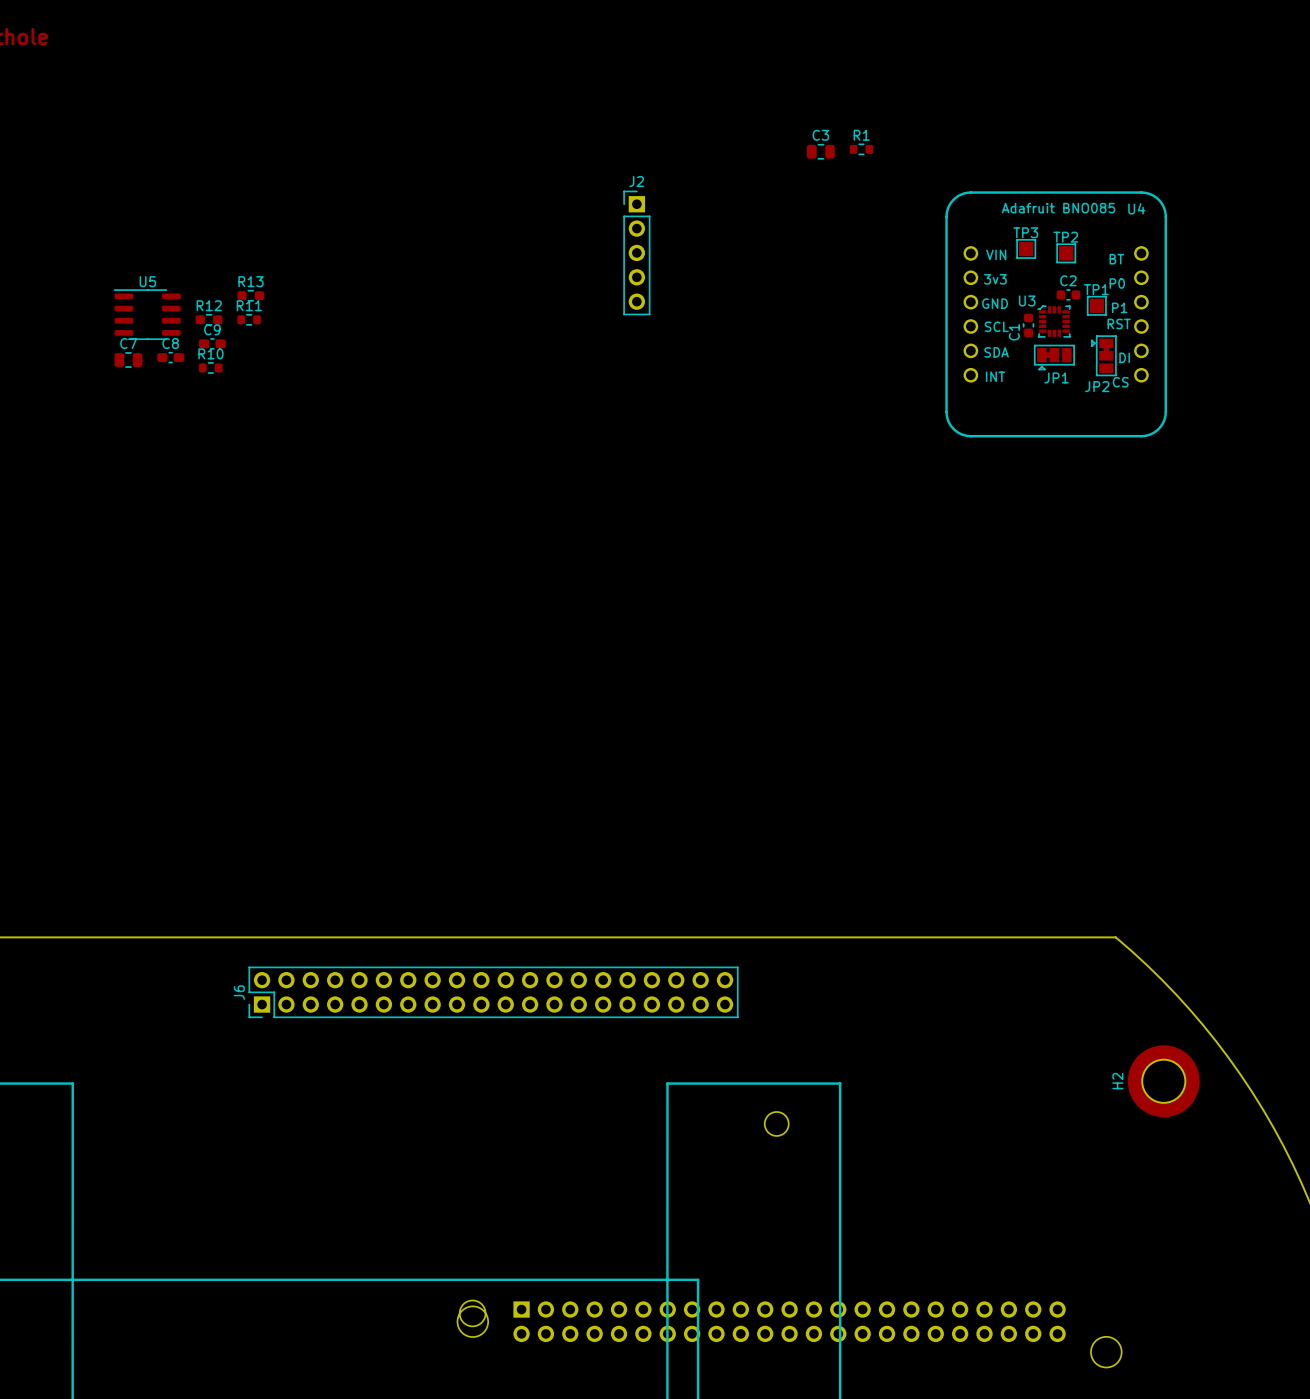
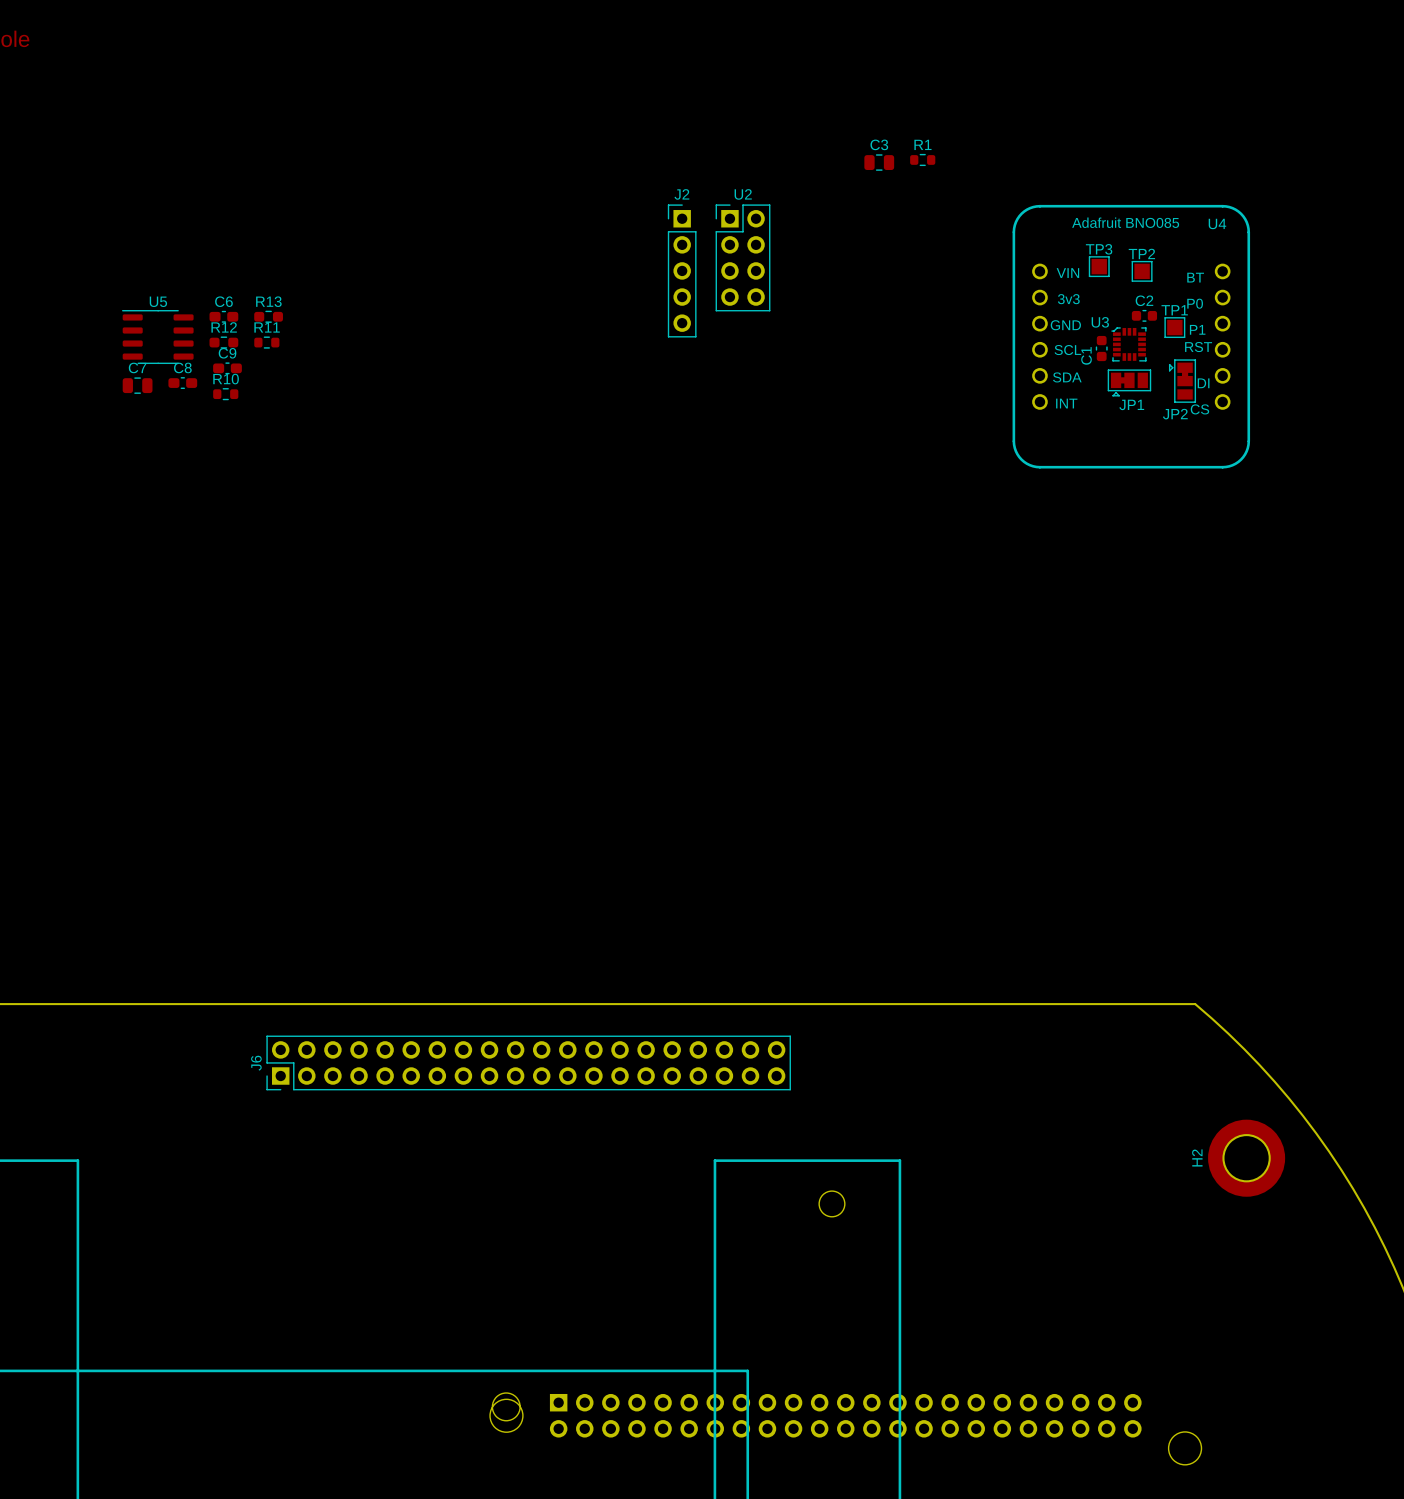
U2: none -> (743, 257)
C6: none -> (223, 316)

